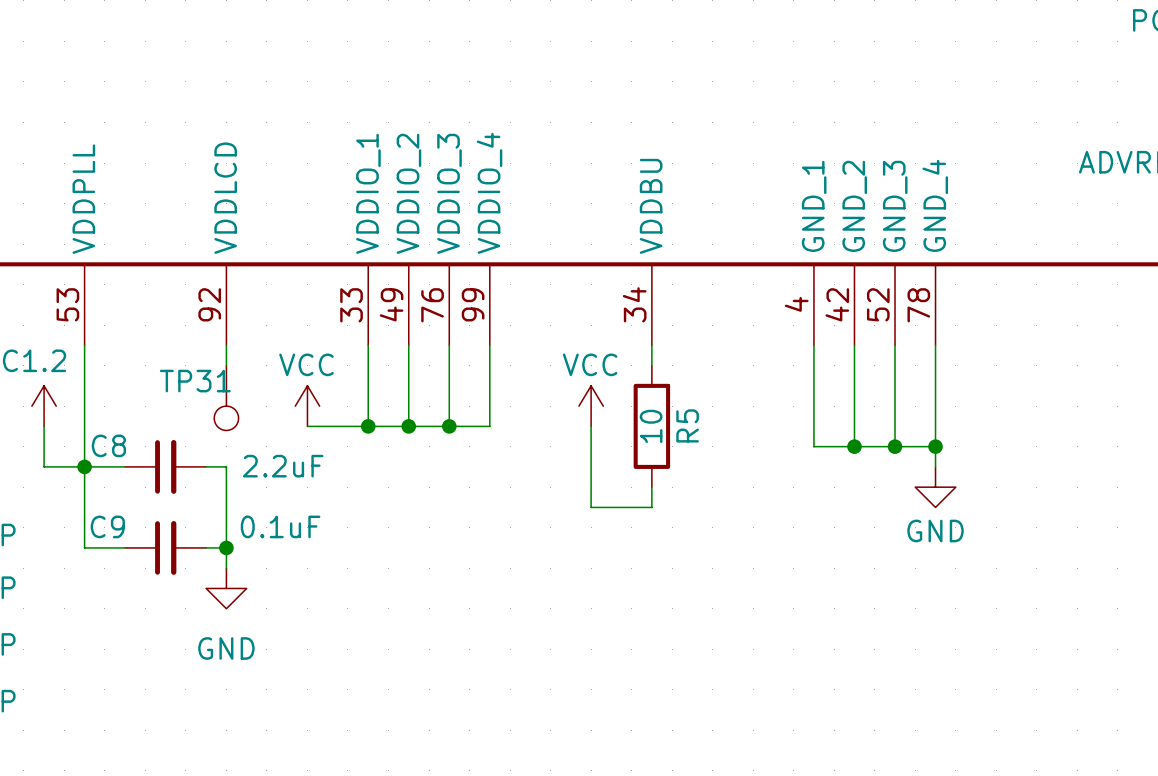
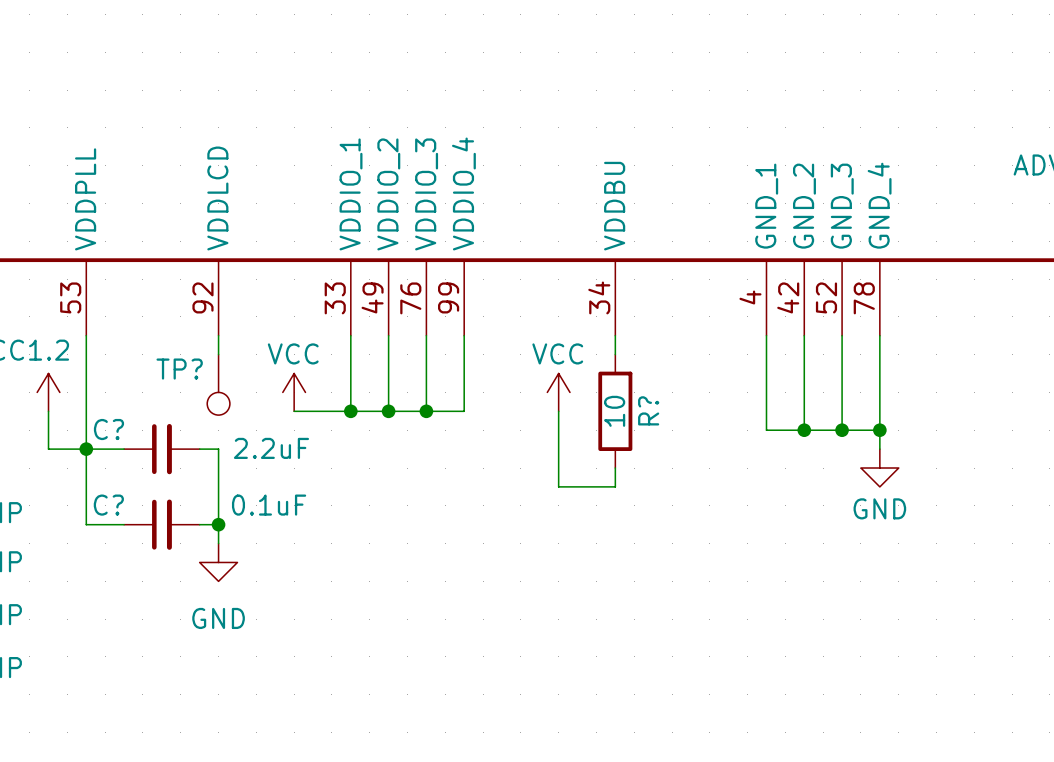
TP31 name: TP31 (195, 381) -> TP? (179, 369)
R5 name: R5 (687, 425) -> R? (648, 410)
C8 name: C8 (108, 445) -> C? (108, 429)
C9 name: C9 (107, 526) -> C? (108, 505)

